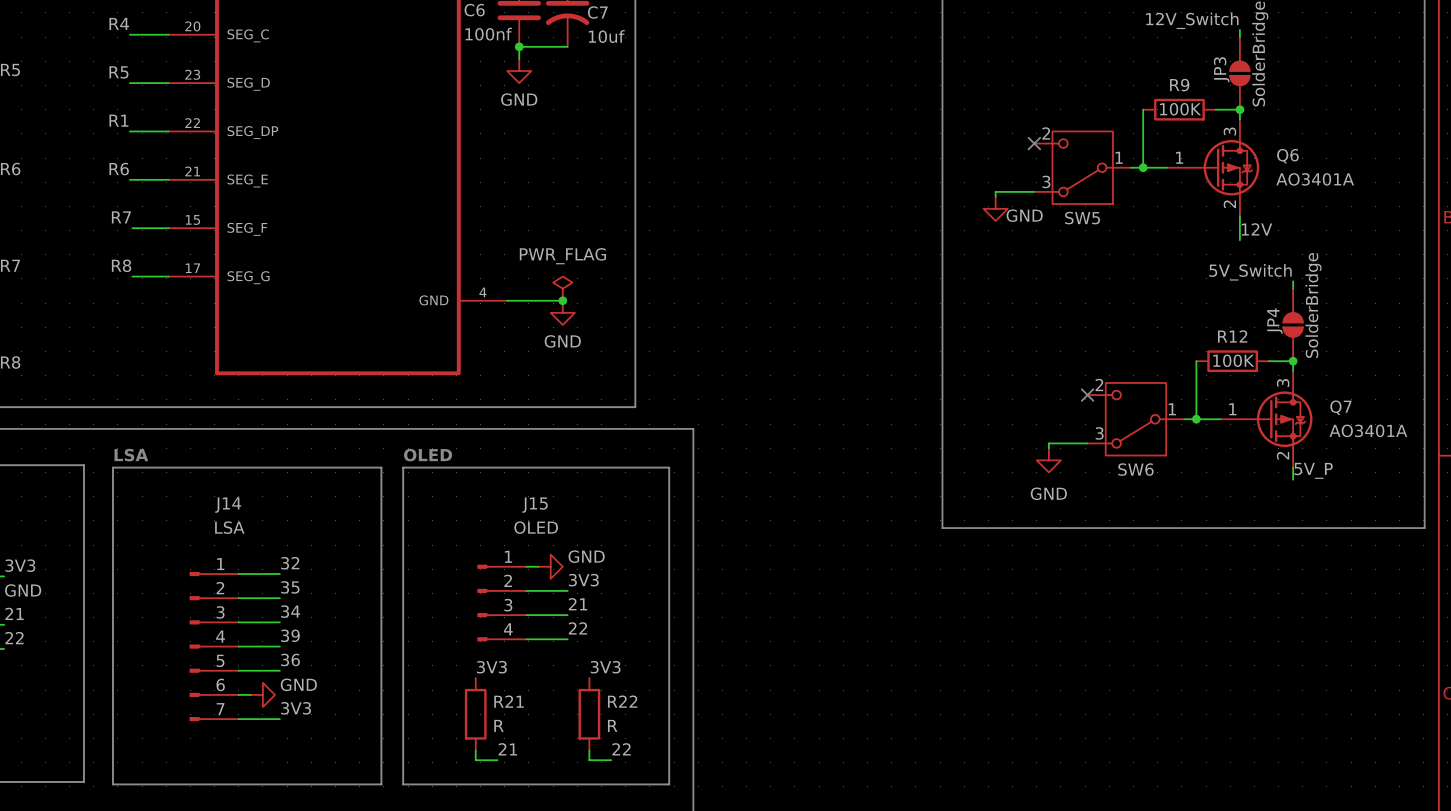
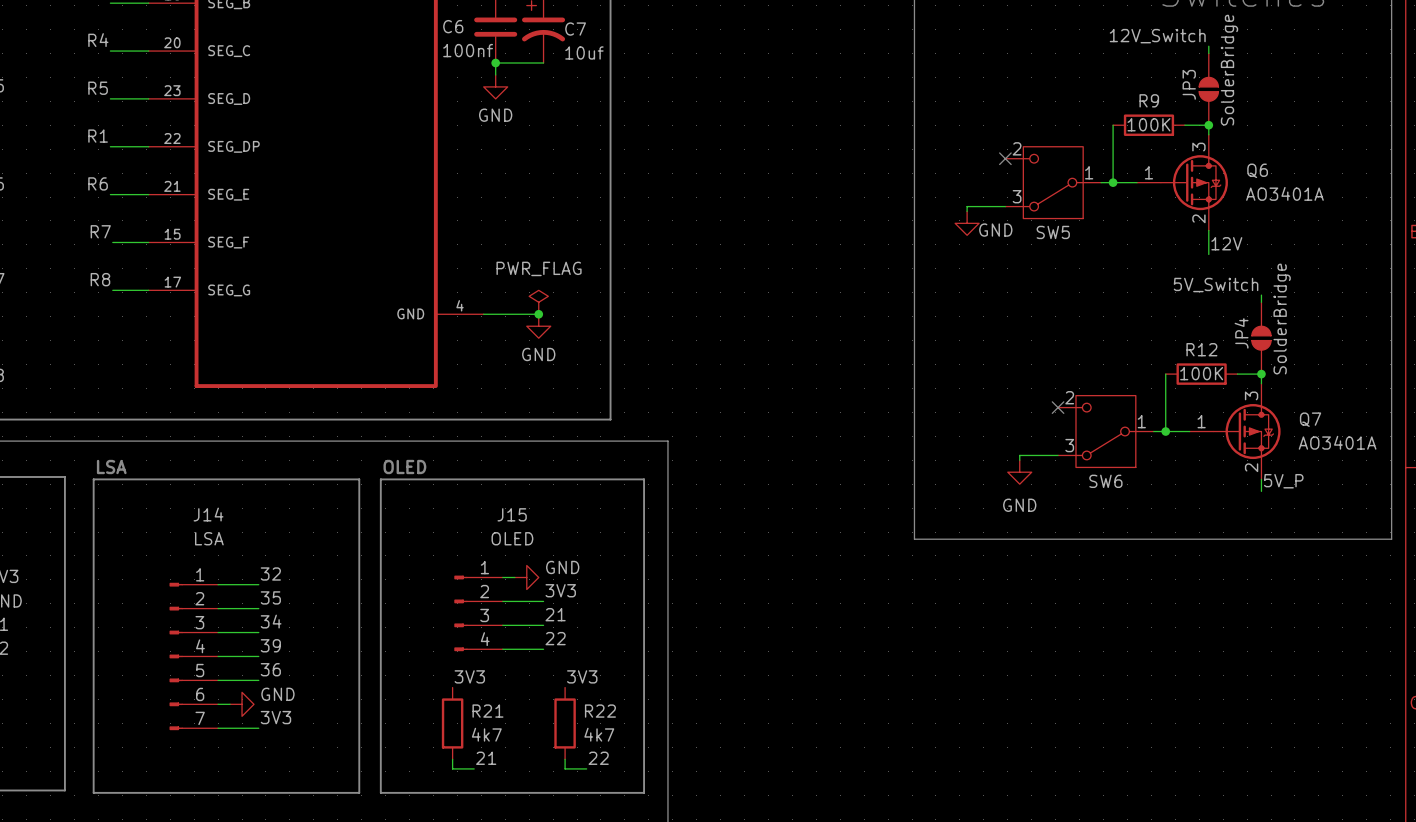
R21 value: R (499, 725) -> 4k7 (486, 734)
R22 value: R (612, 725) -> 4k7 (599, 734)

